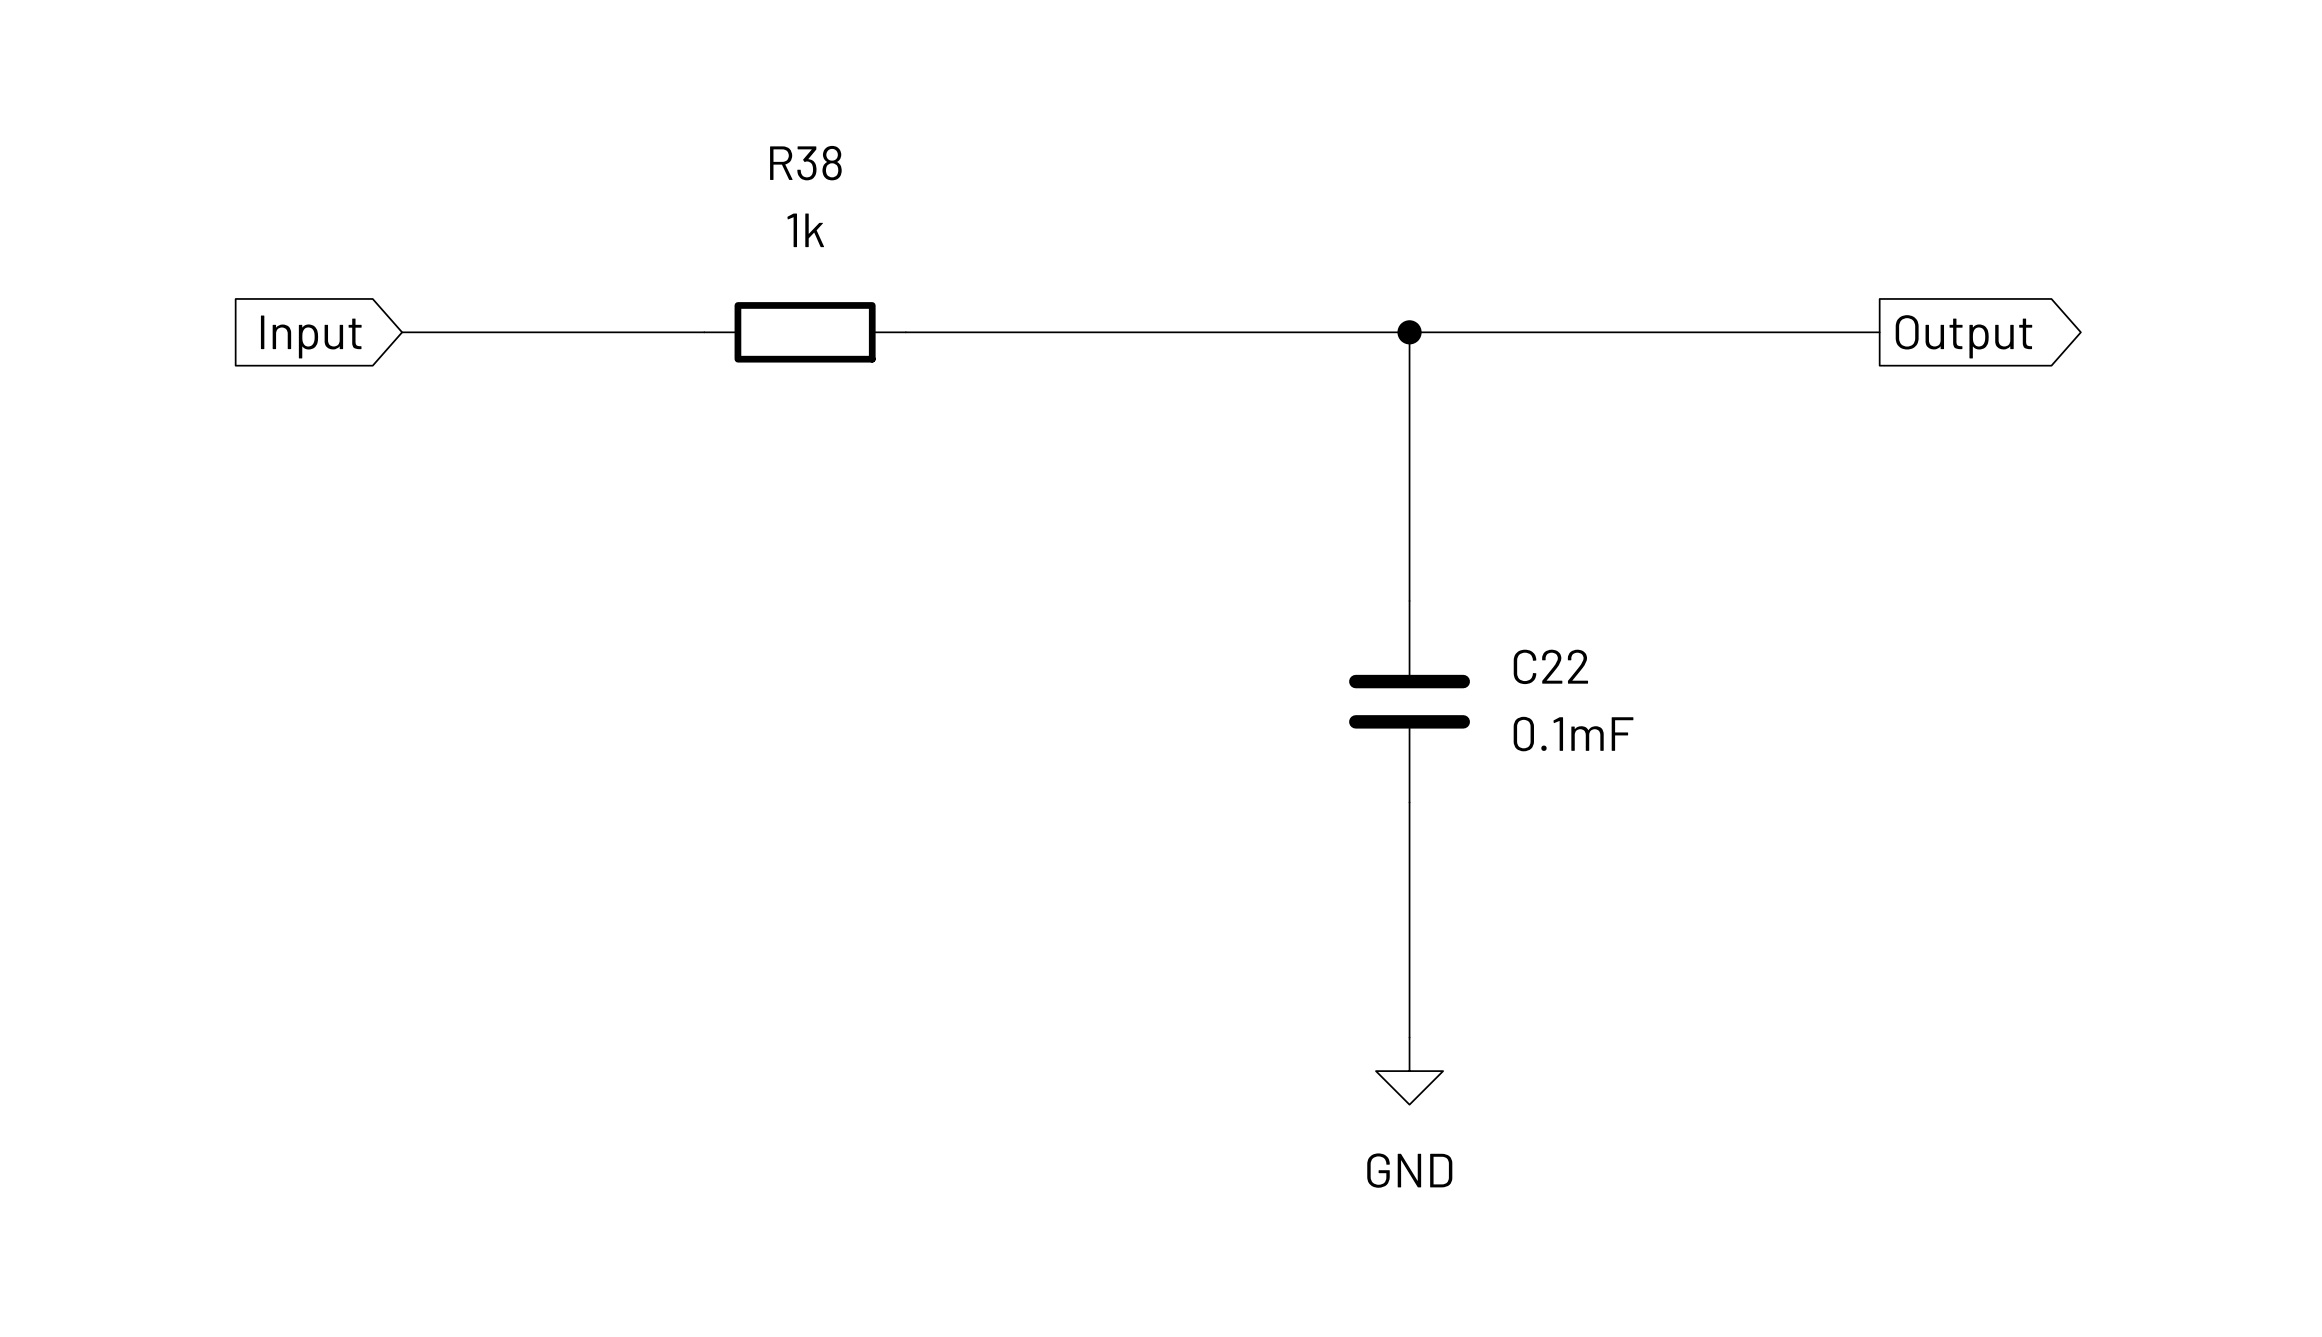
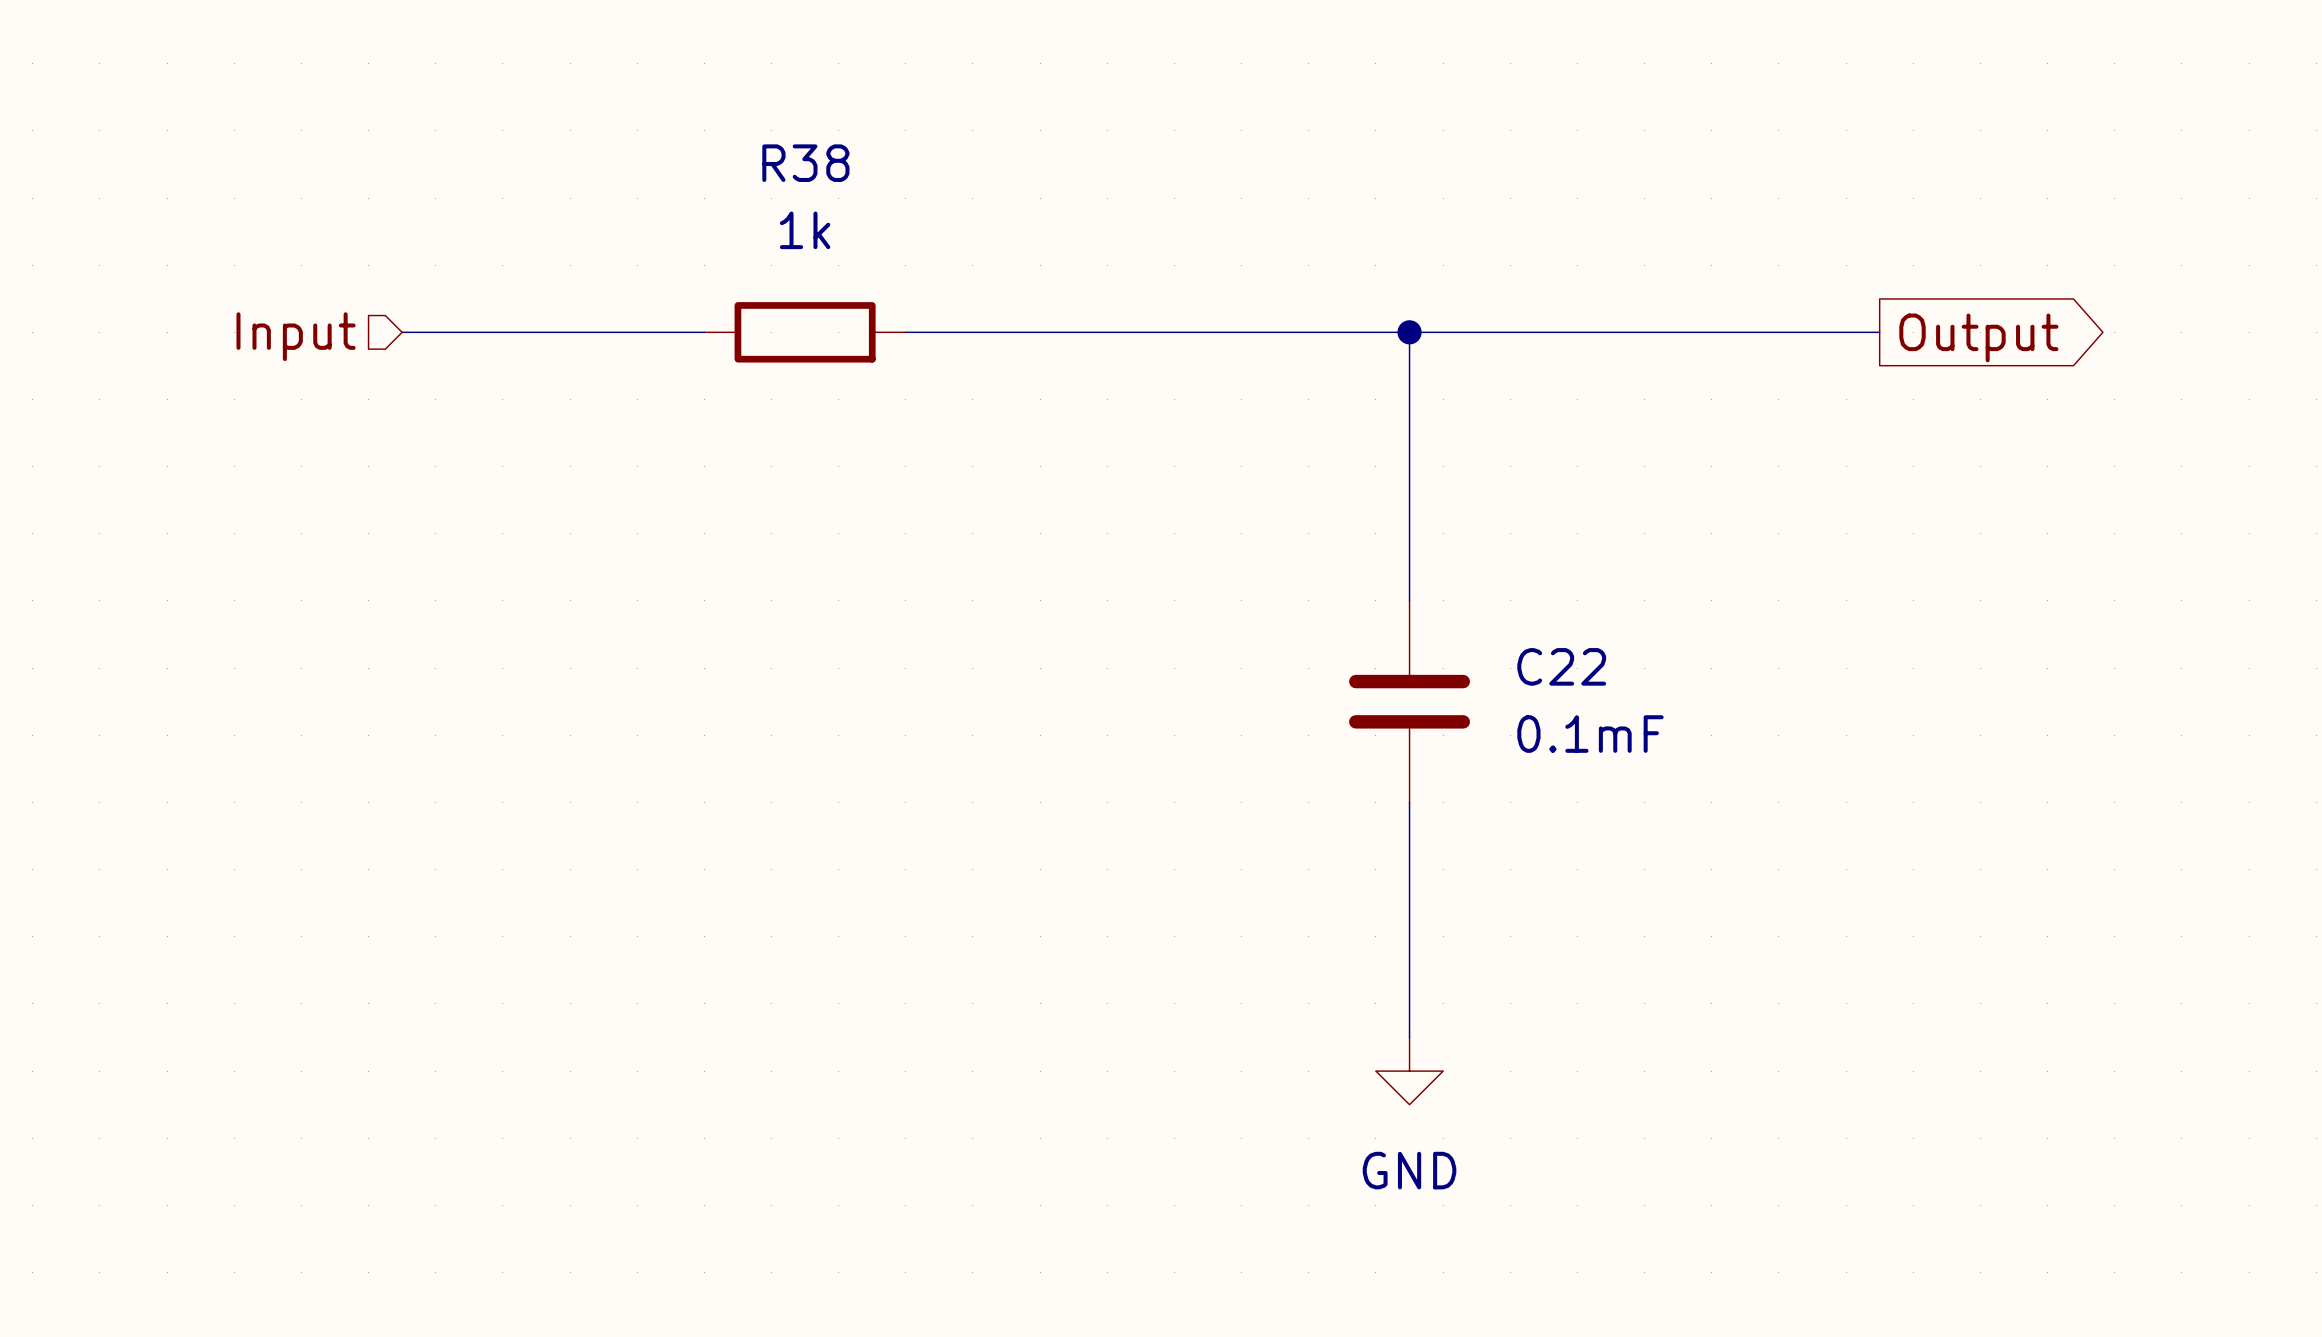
hierarchical label: none -> Input (296, 336)
global label: Input (311, 336) -> none

